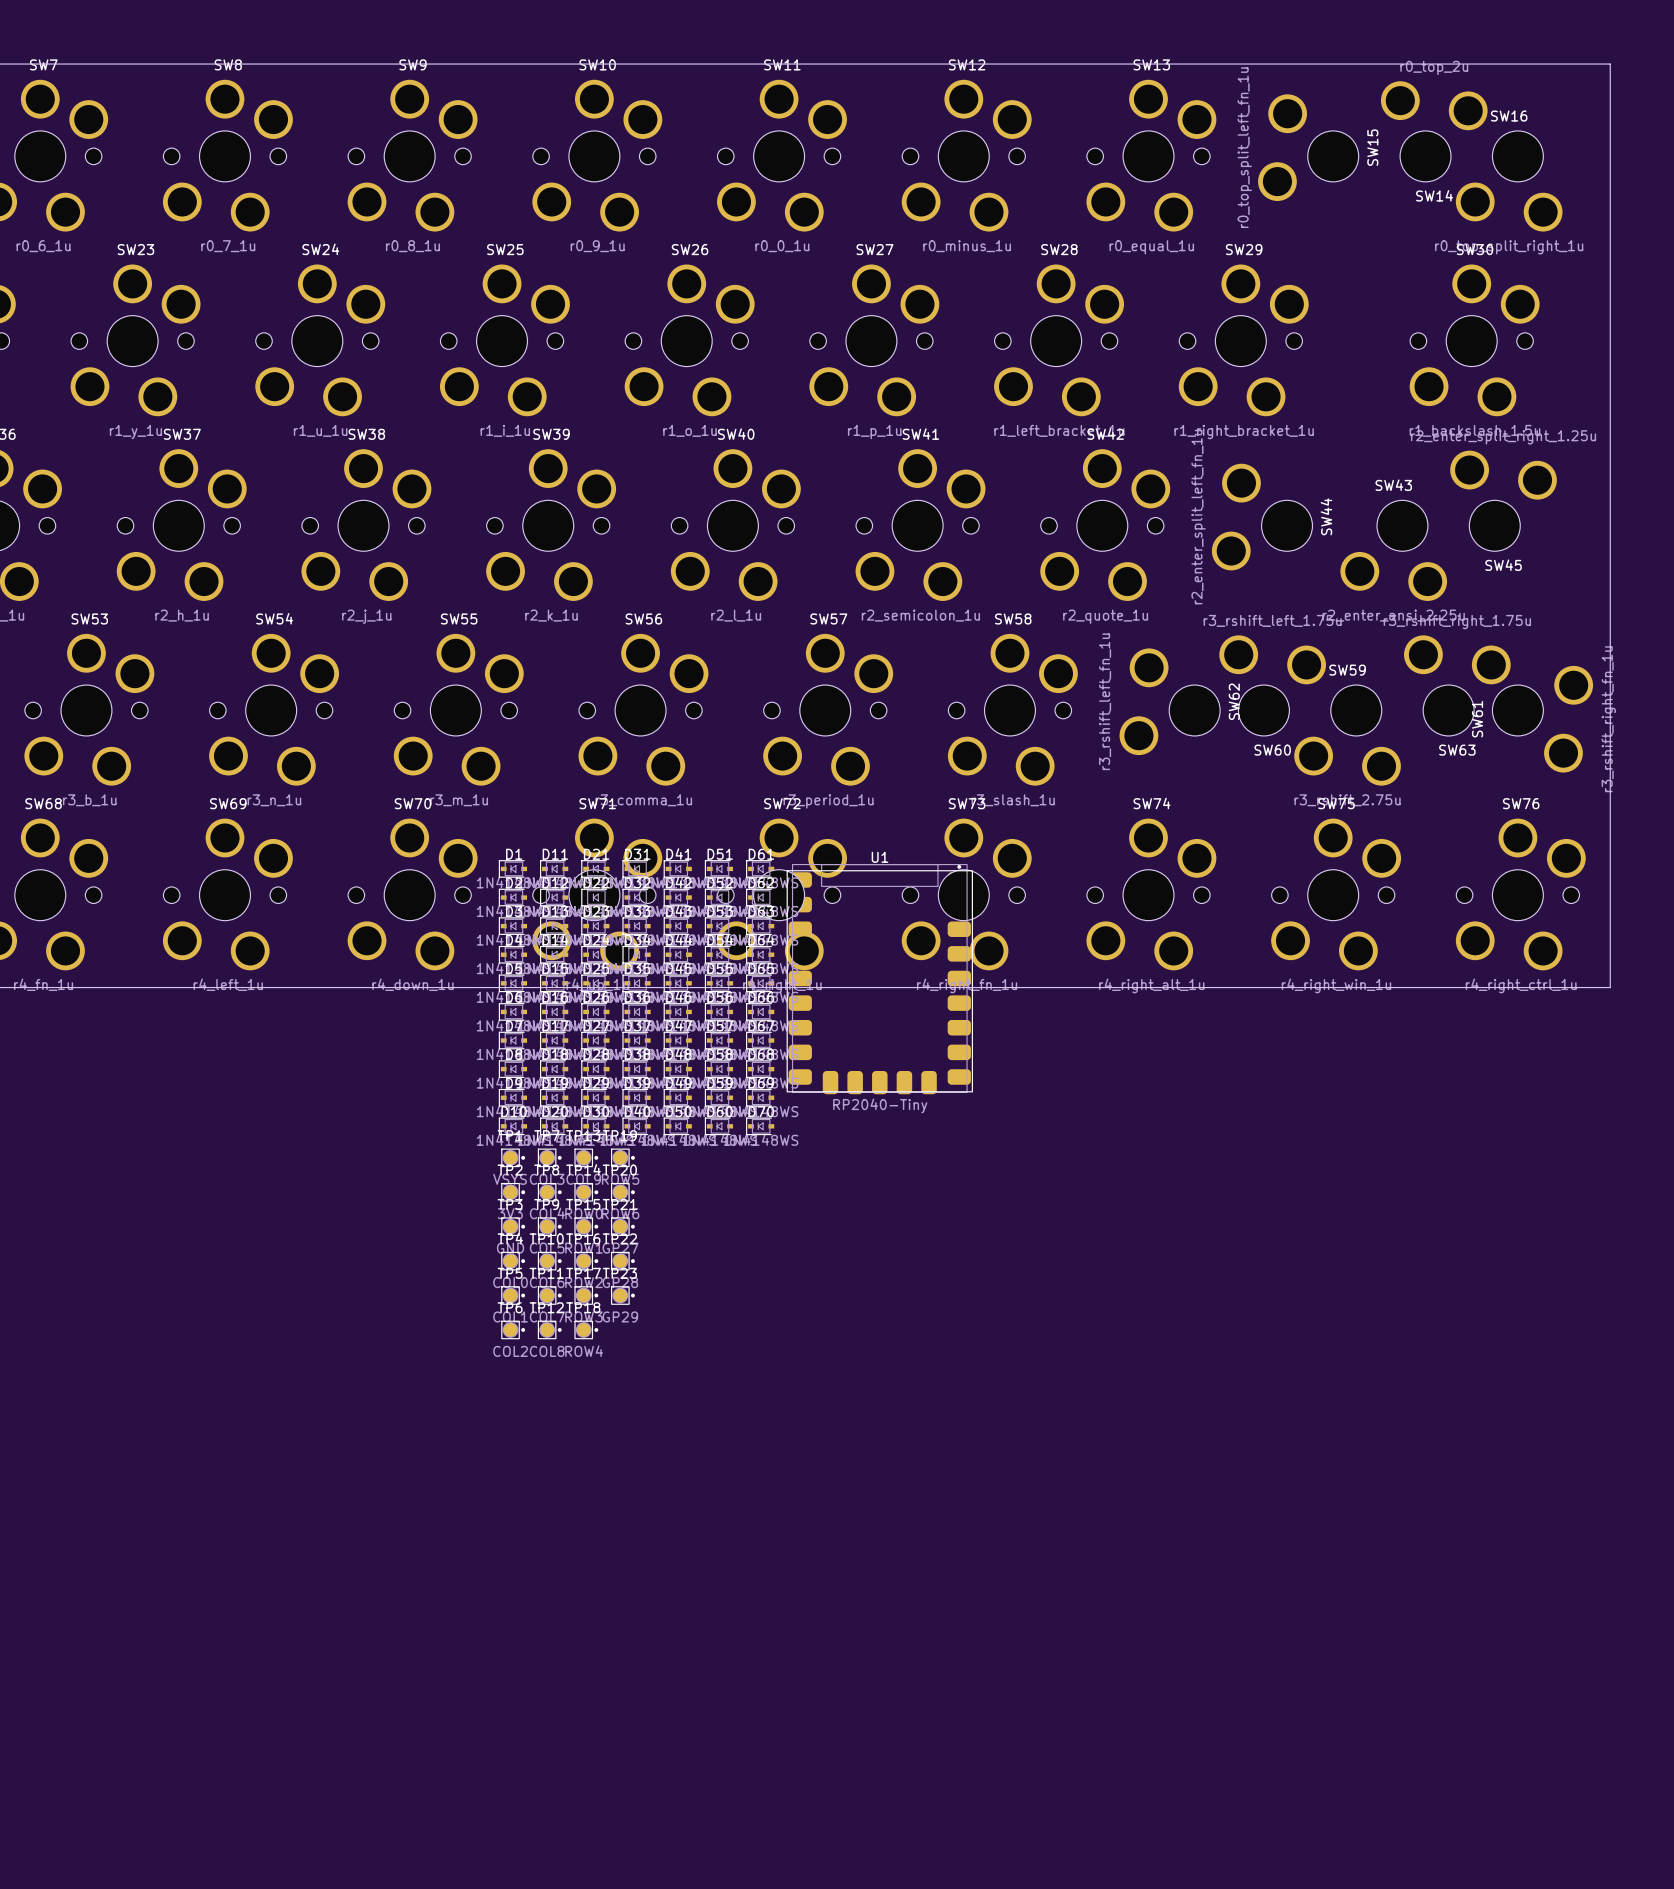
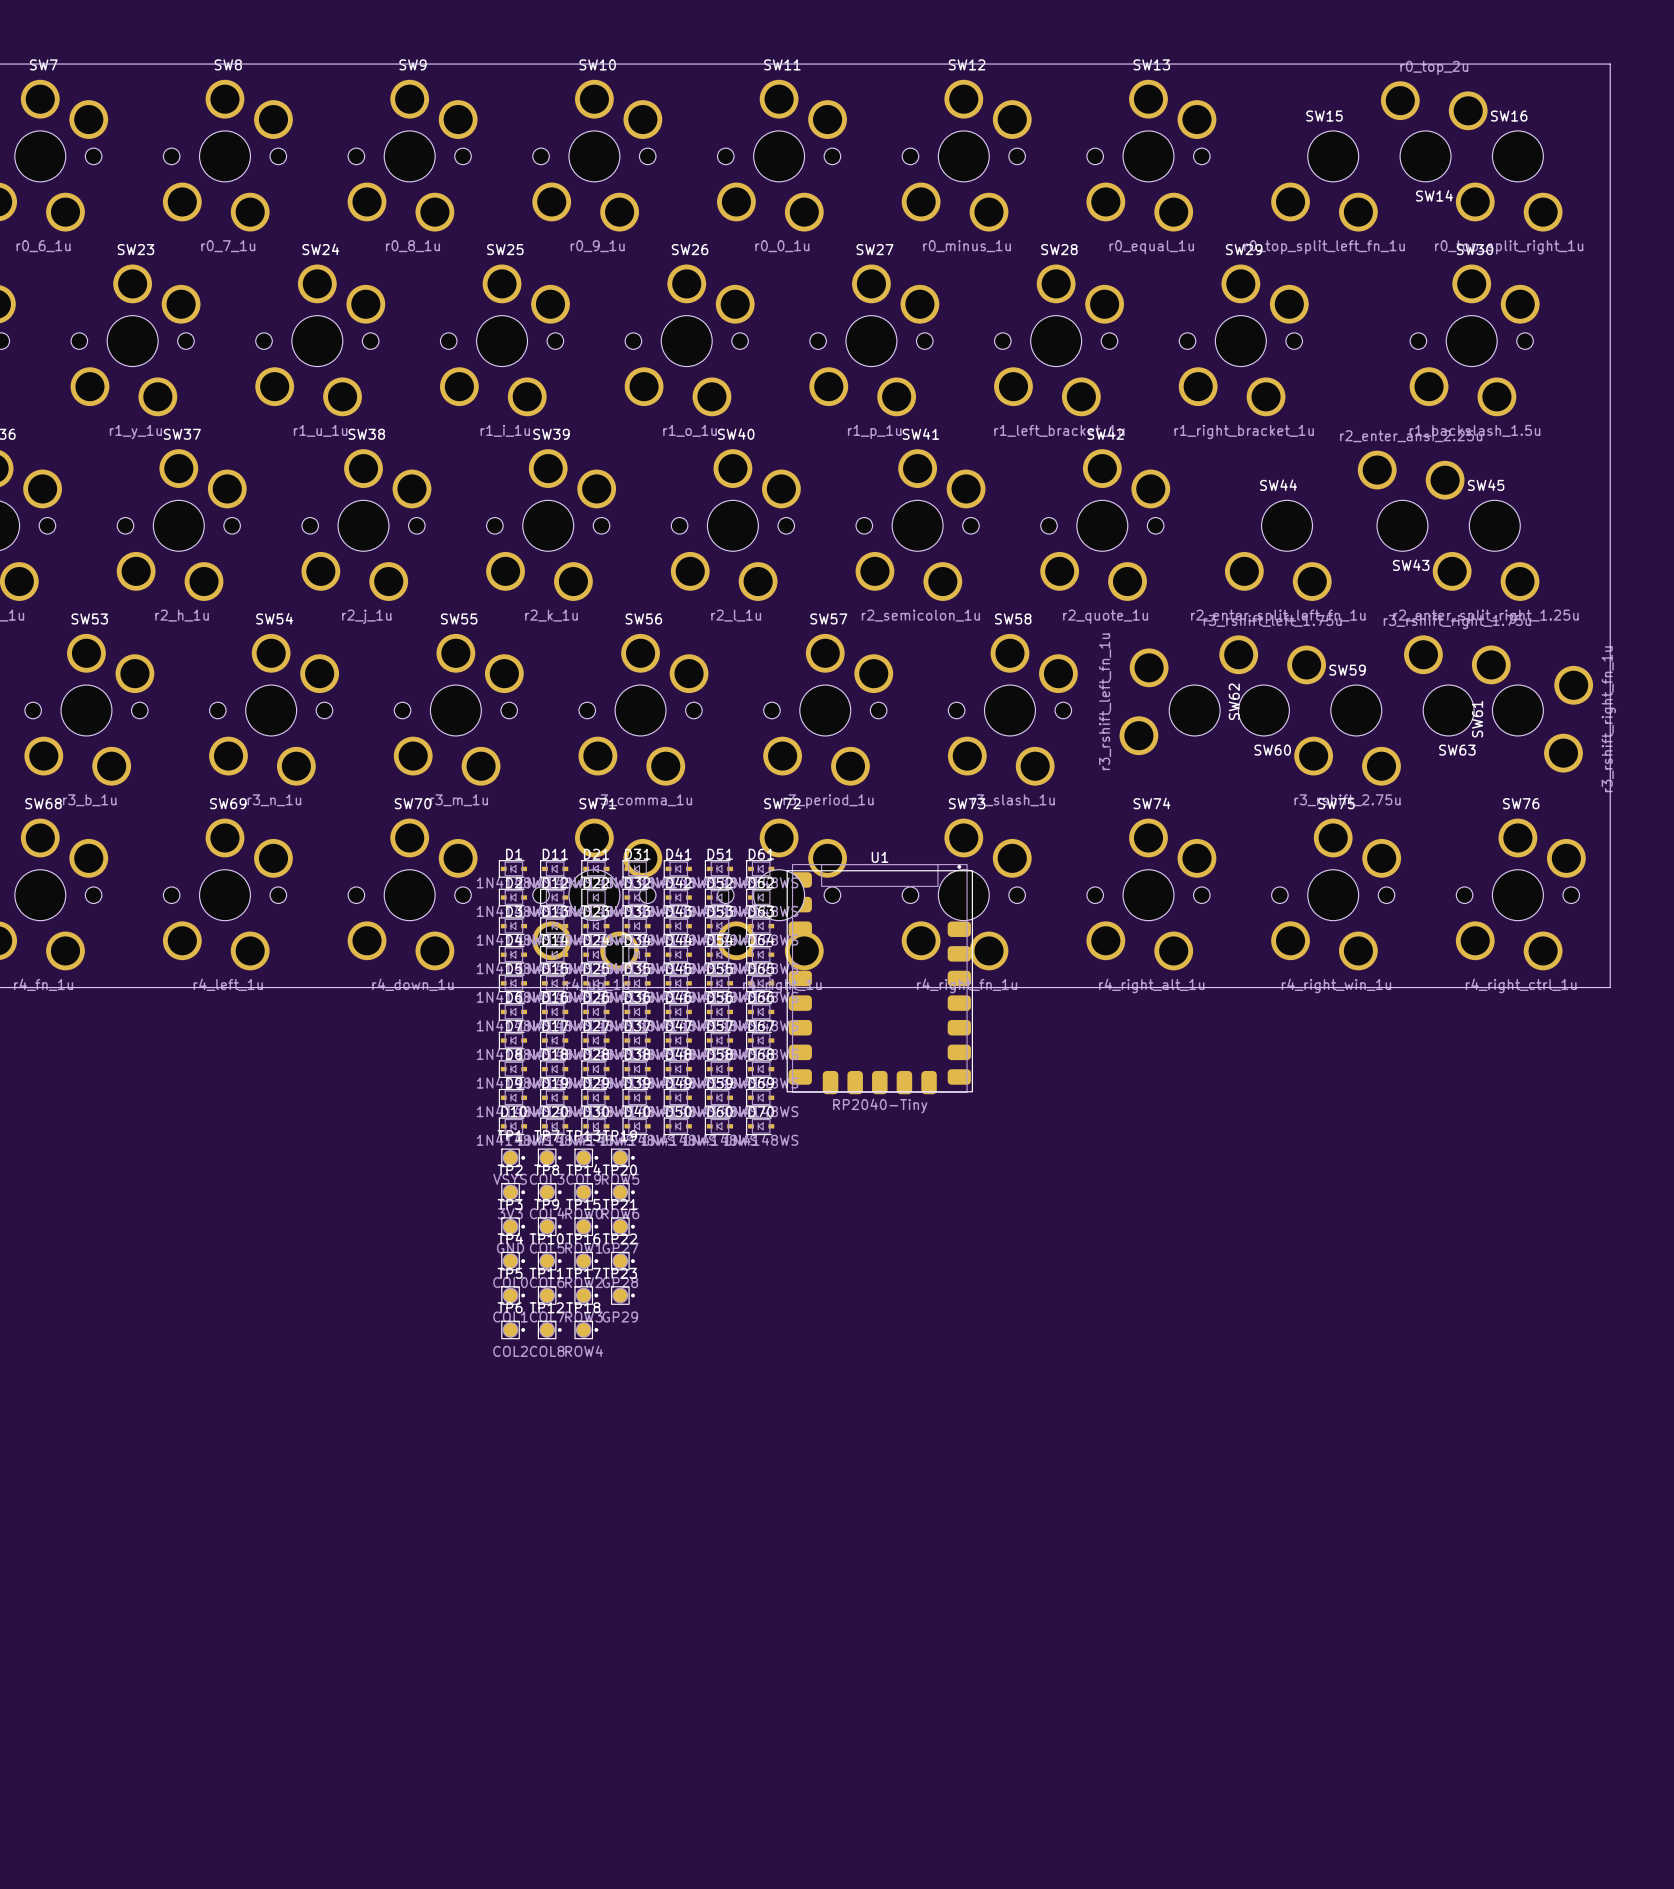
SW15 rotation: 0° (1308, 147) -> 90° counterclockwise (1324, 181)
SW45 rotation: 0° (1503, 500) -> 180° (1486, 550)
SW44 rotation: 0° (1262, 517) -> 90° counterclockwise (1278, 550)
SW43 rotation: 0° (1393, 550) -> 180° (1411, 500)

